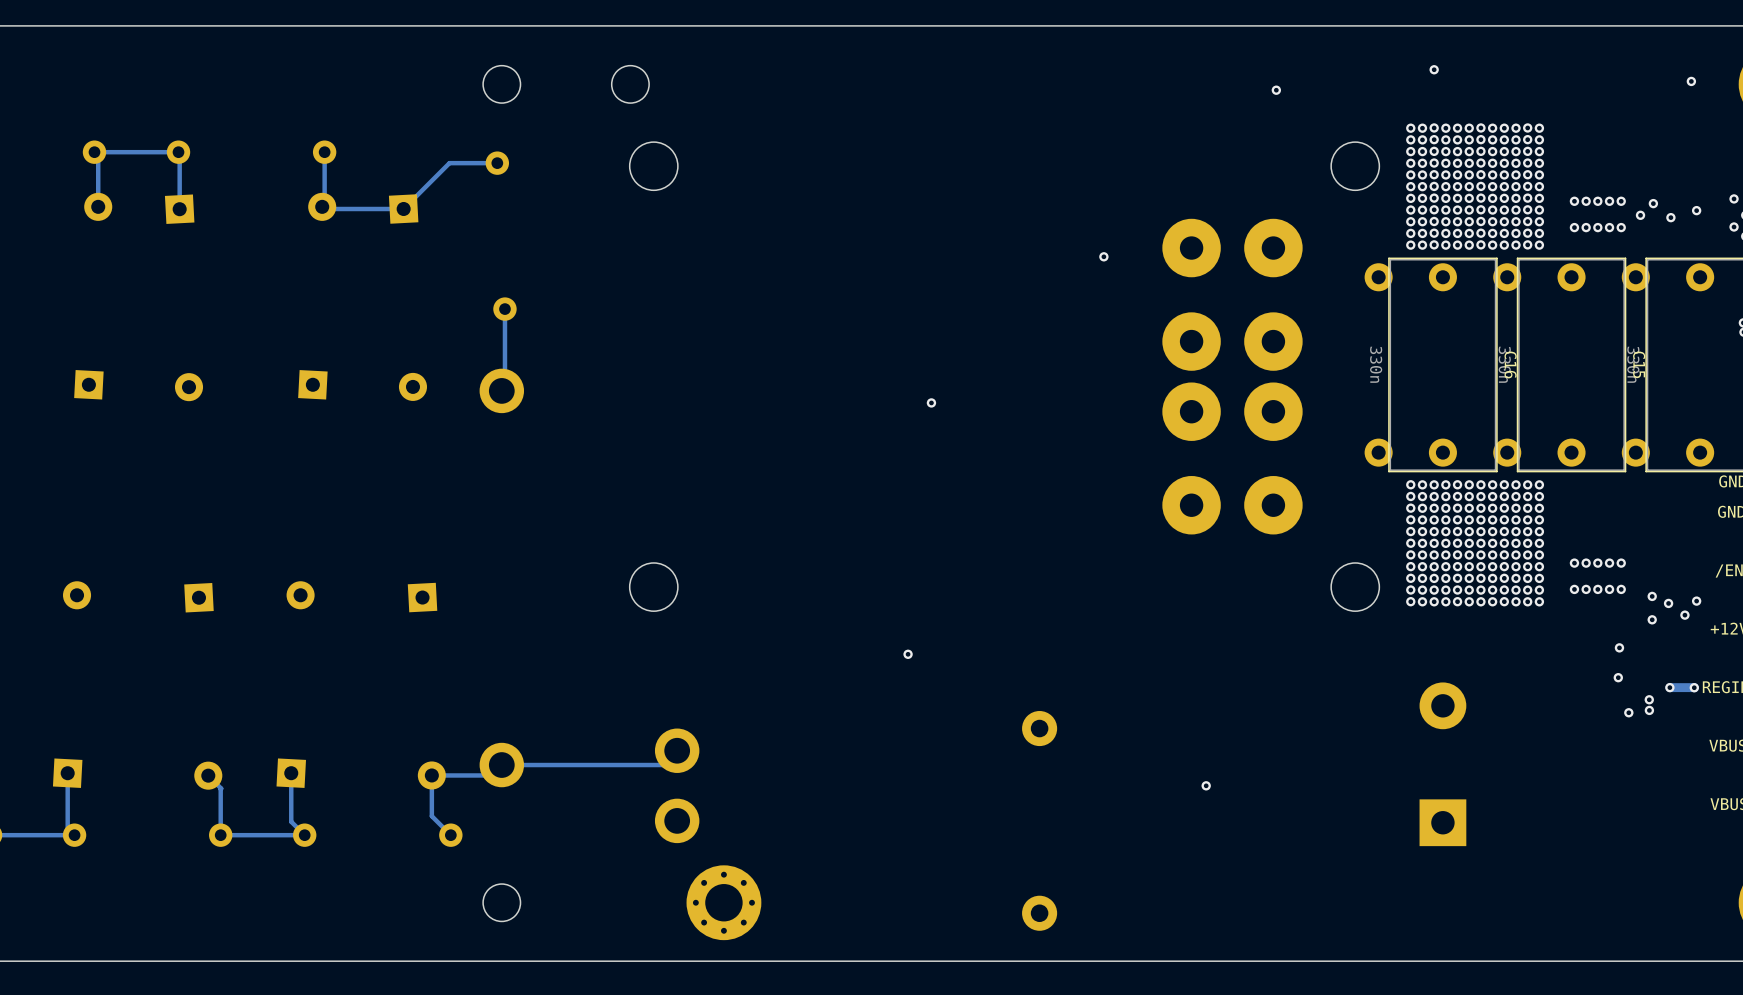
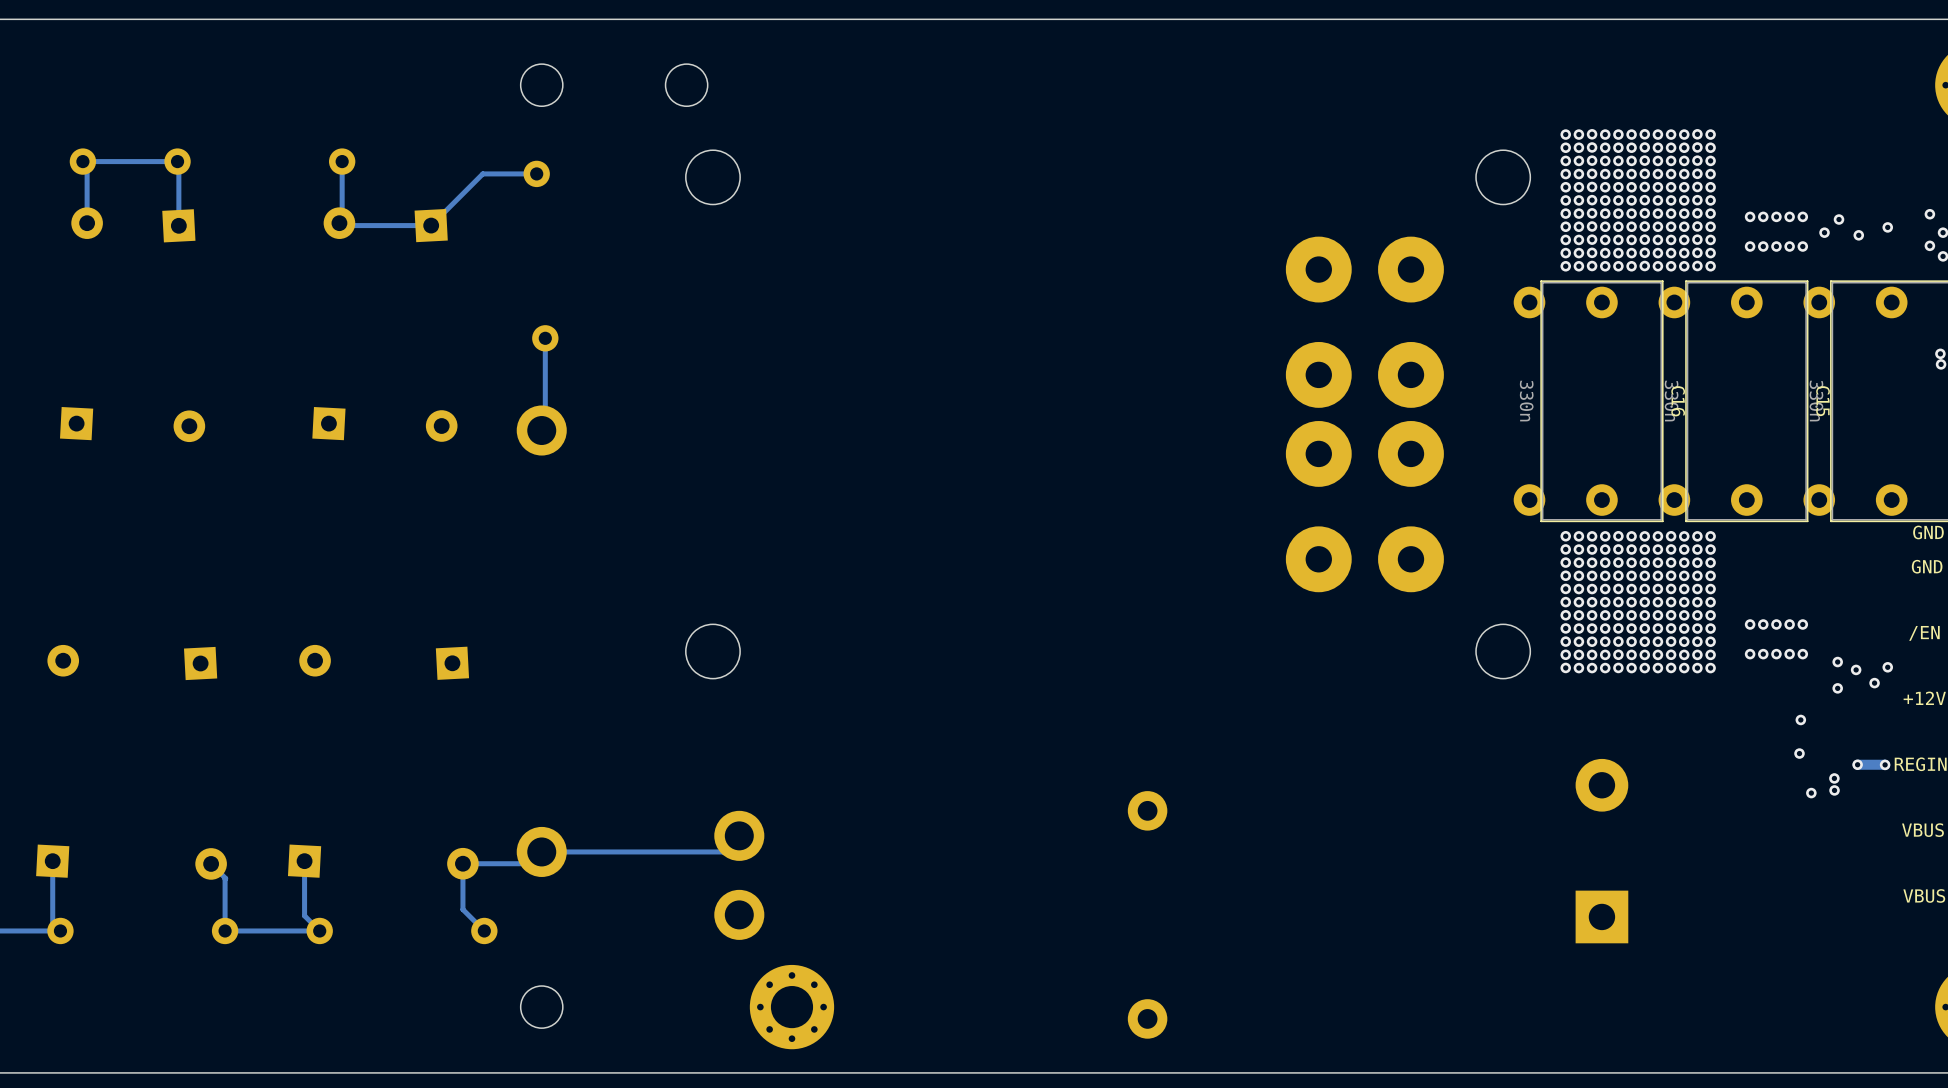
via: (1434, 69) -> none
via: (1691, 81) -> none
via: (1276, 90) -> none
via: (1103, 256) -> none
via: (931, 402) -> none
via: (908, 654) -> none
via: (1206, 785) -> none

